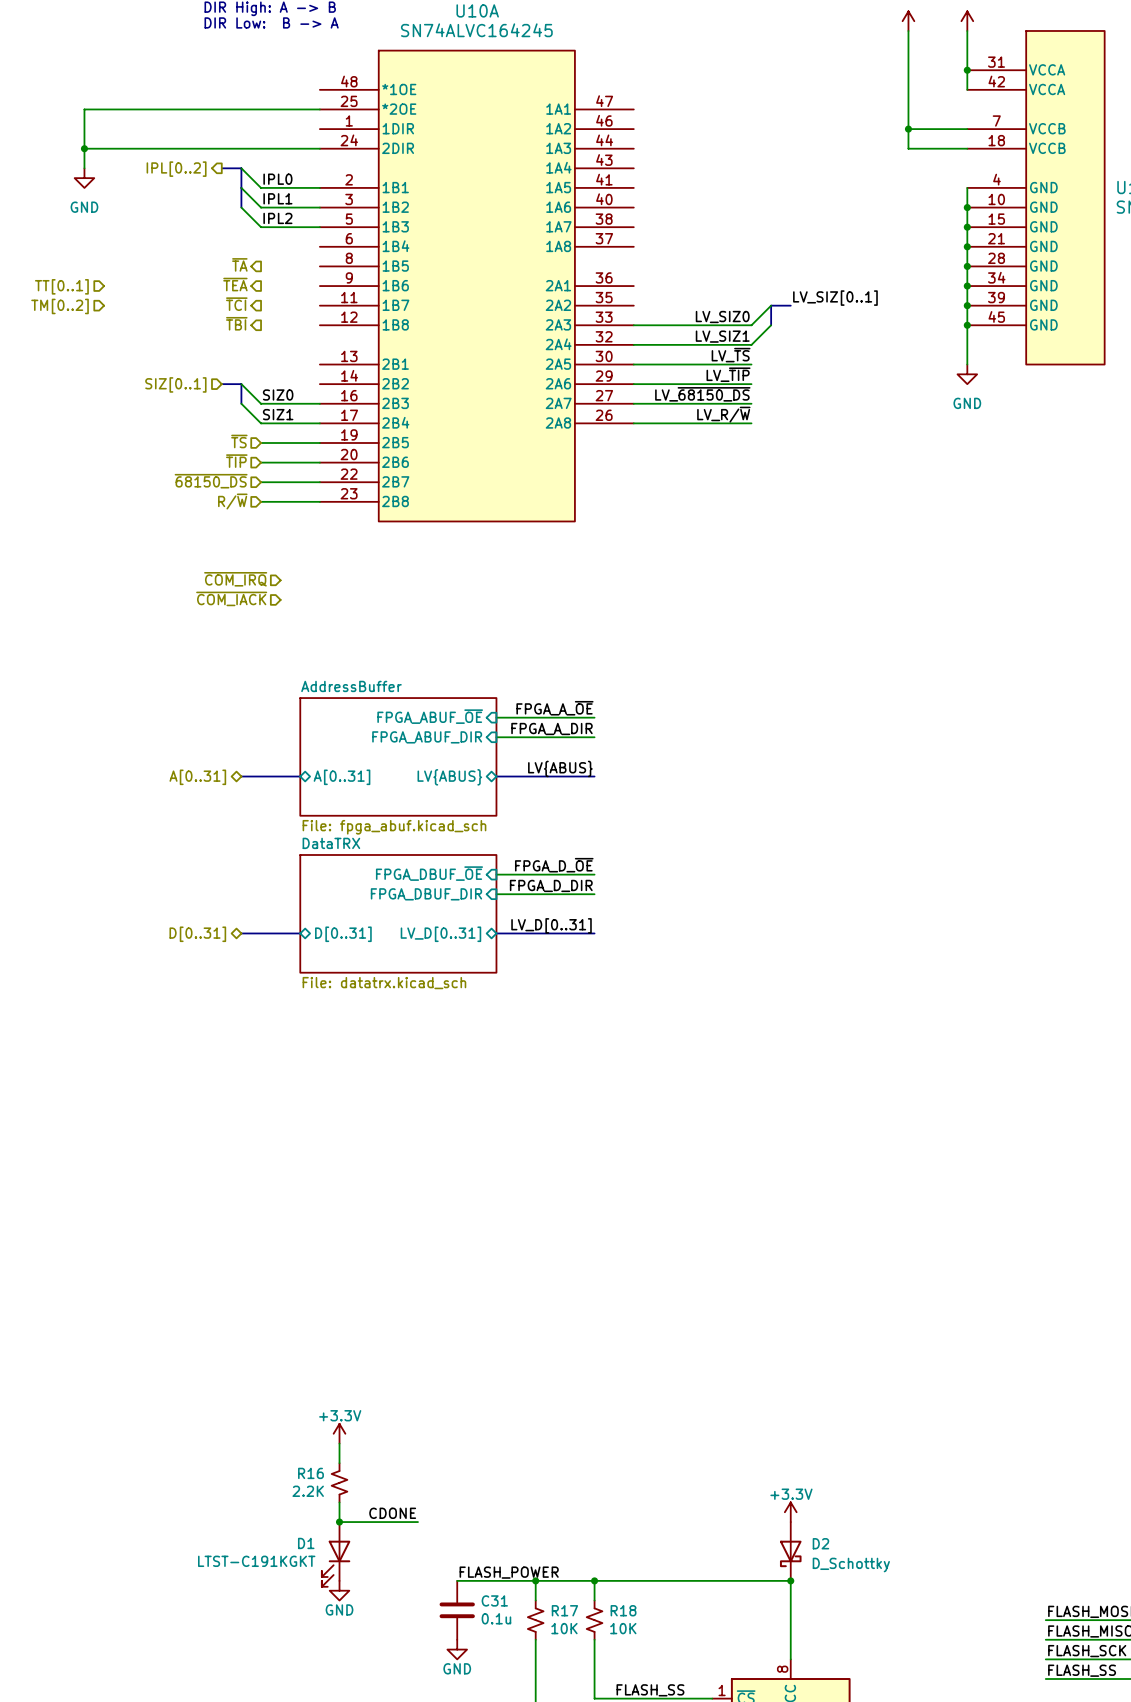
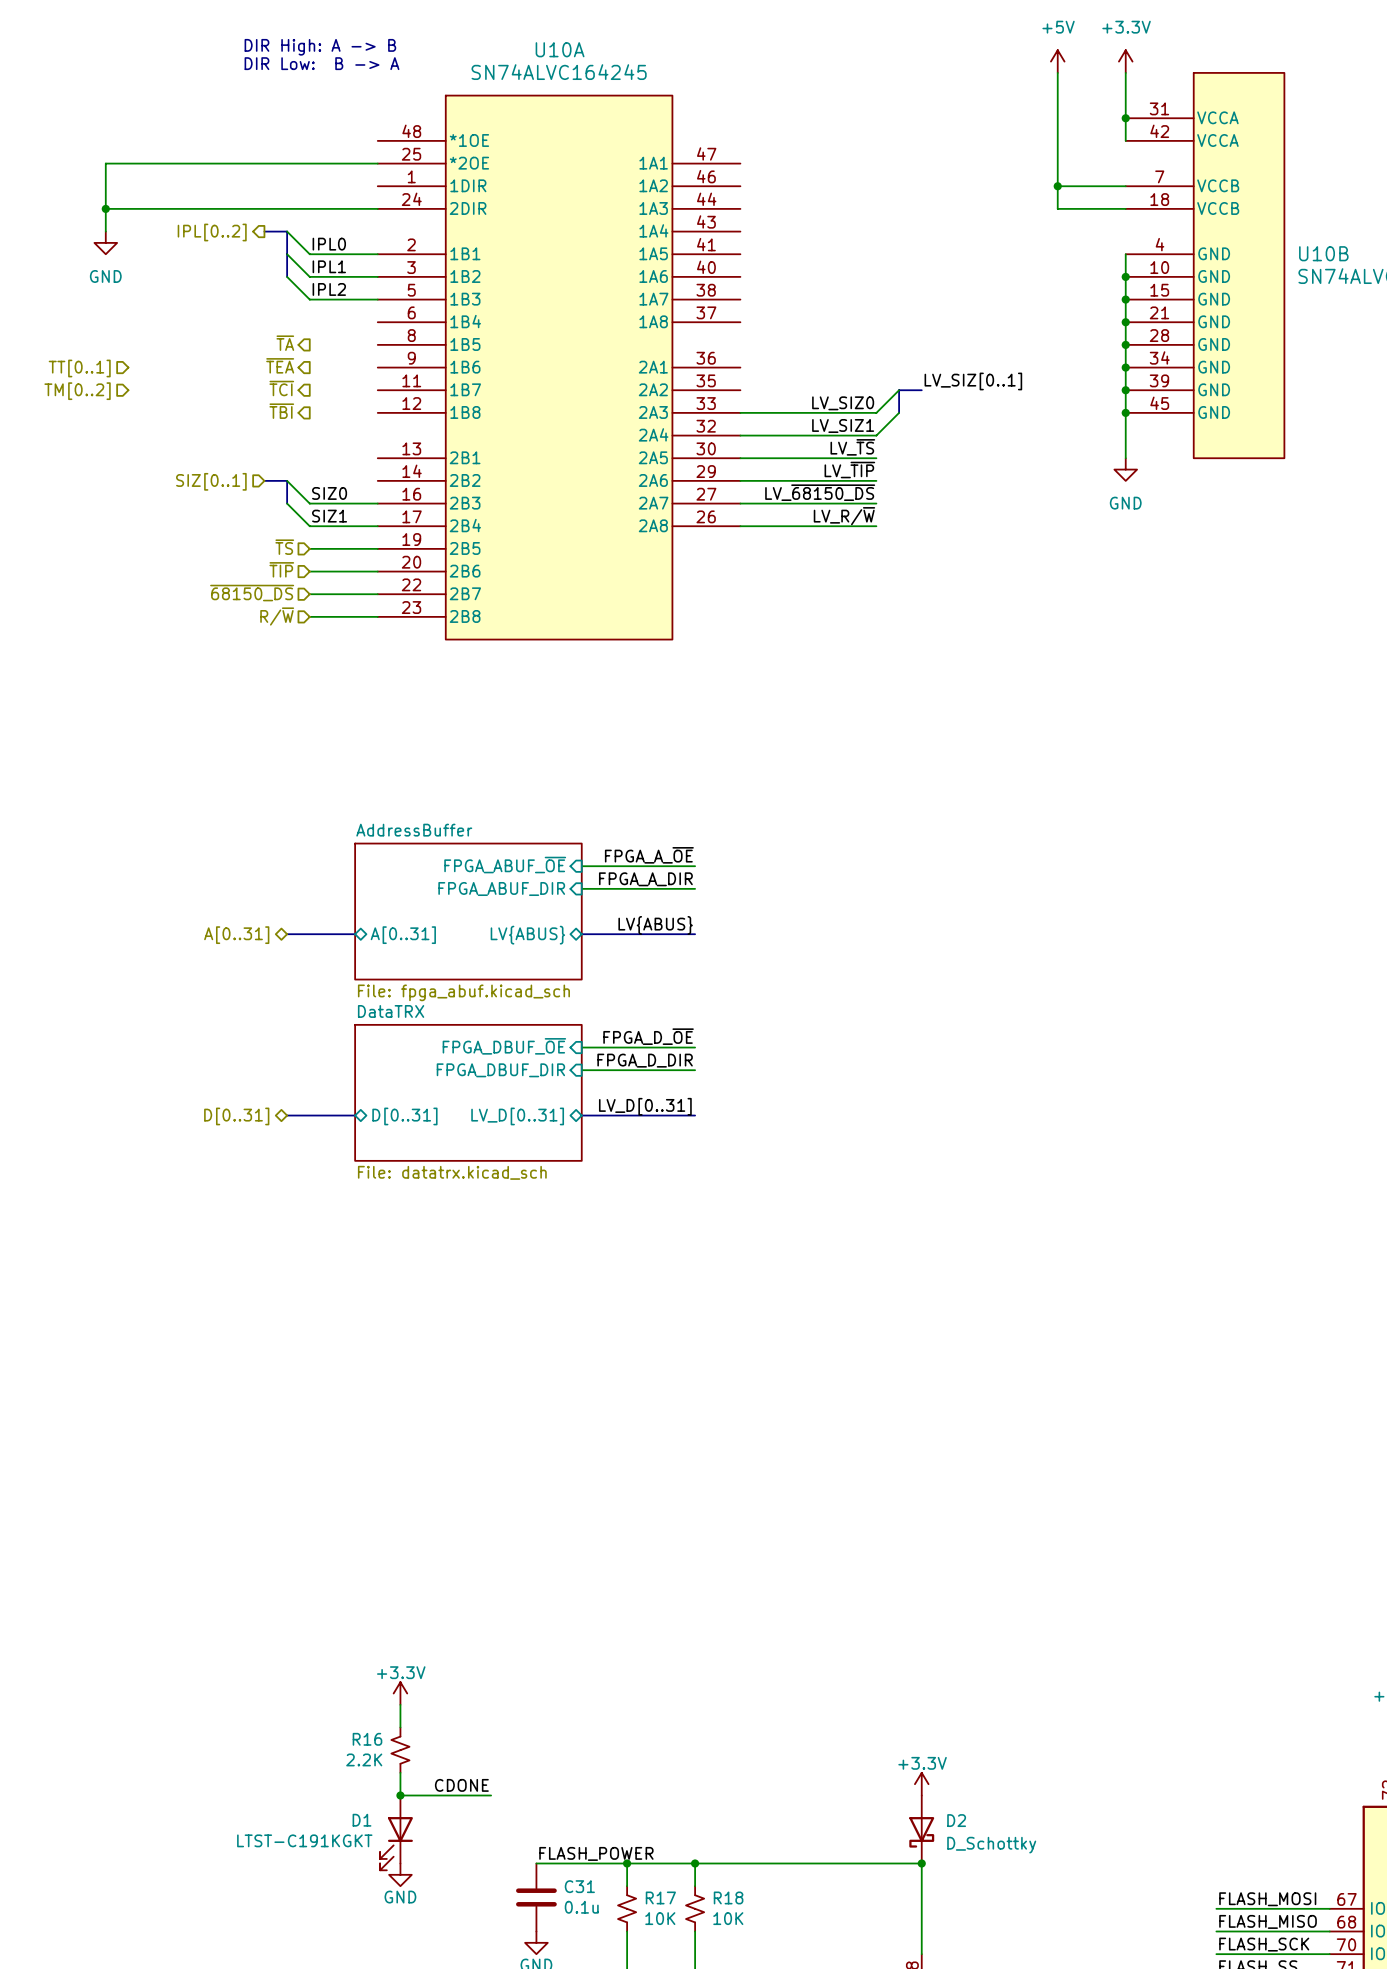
hierarchical label: ~{COM_IRQ} (235, 579) -> none
hierarchical label: ~{COM_IACK} (231, 598) -> none

